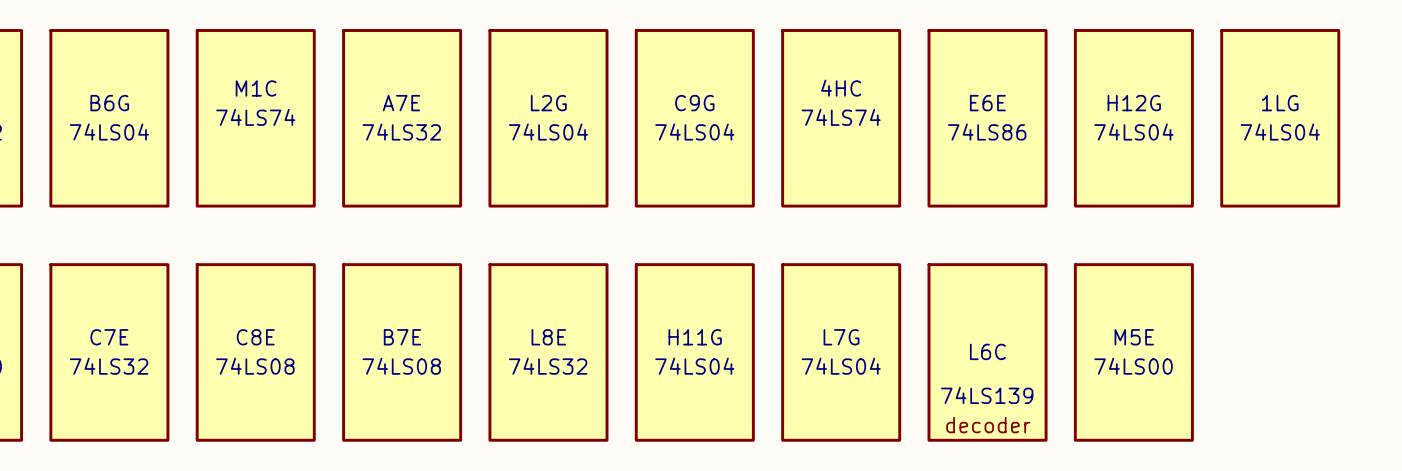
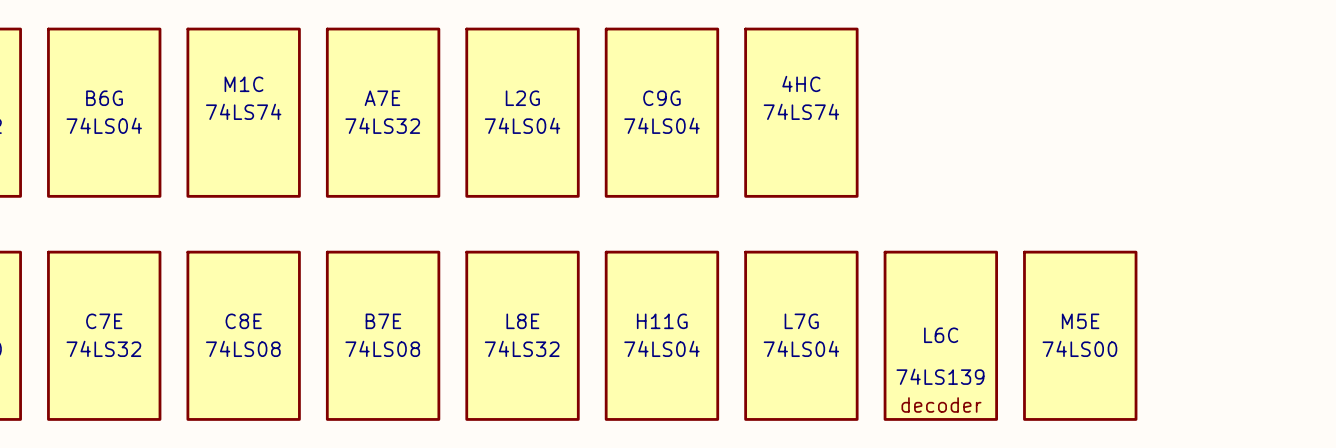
E6E: 74LS86 (987, 118) -> none
H12G: 74LS04 (1133, 118) -> none
1LG: 74LS04 (1280, 118) -> none

